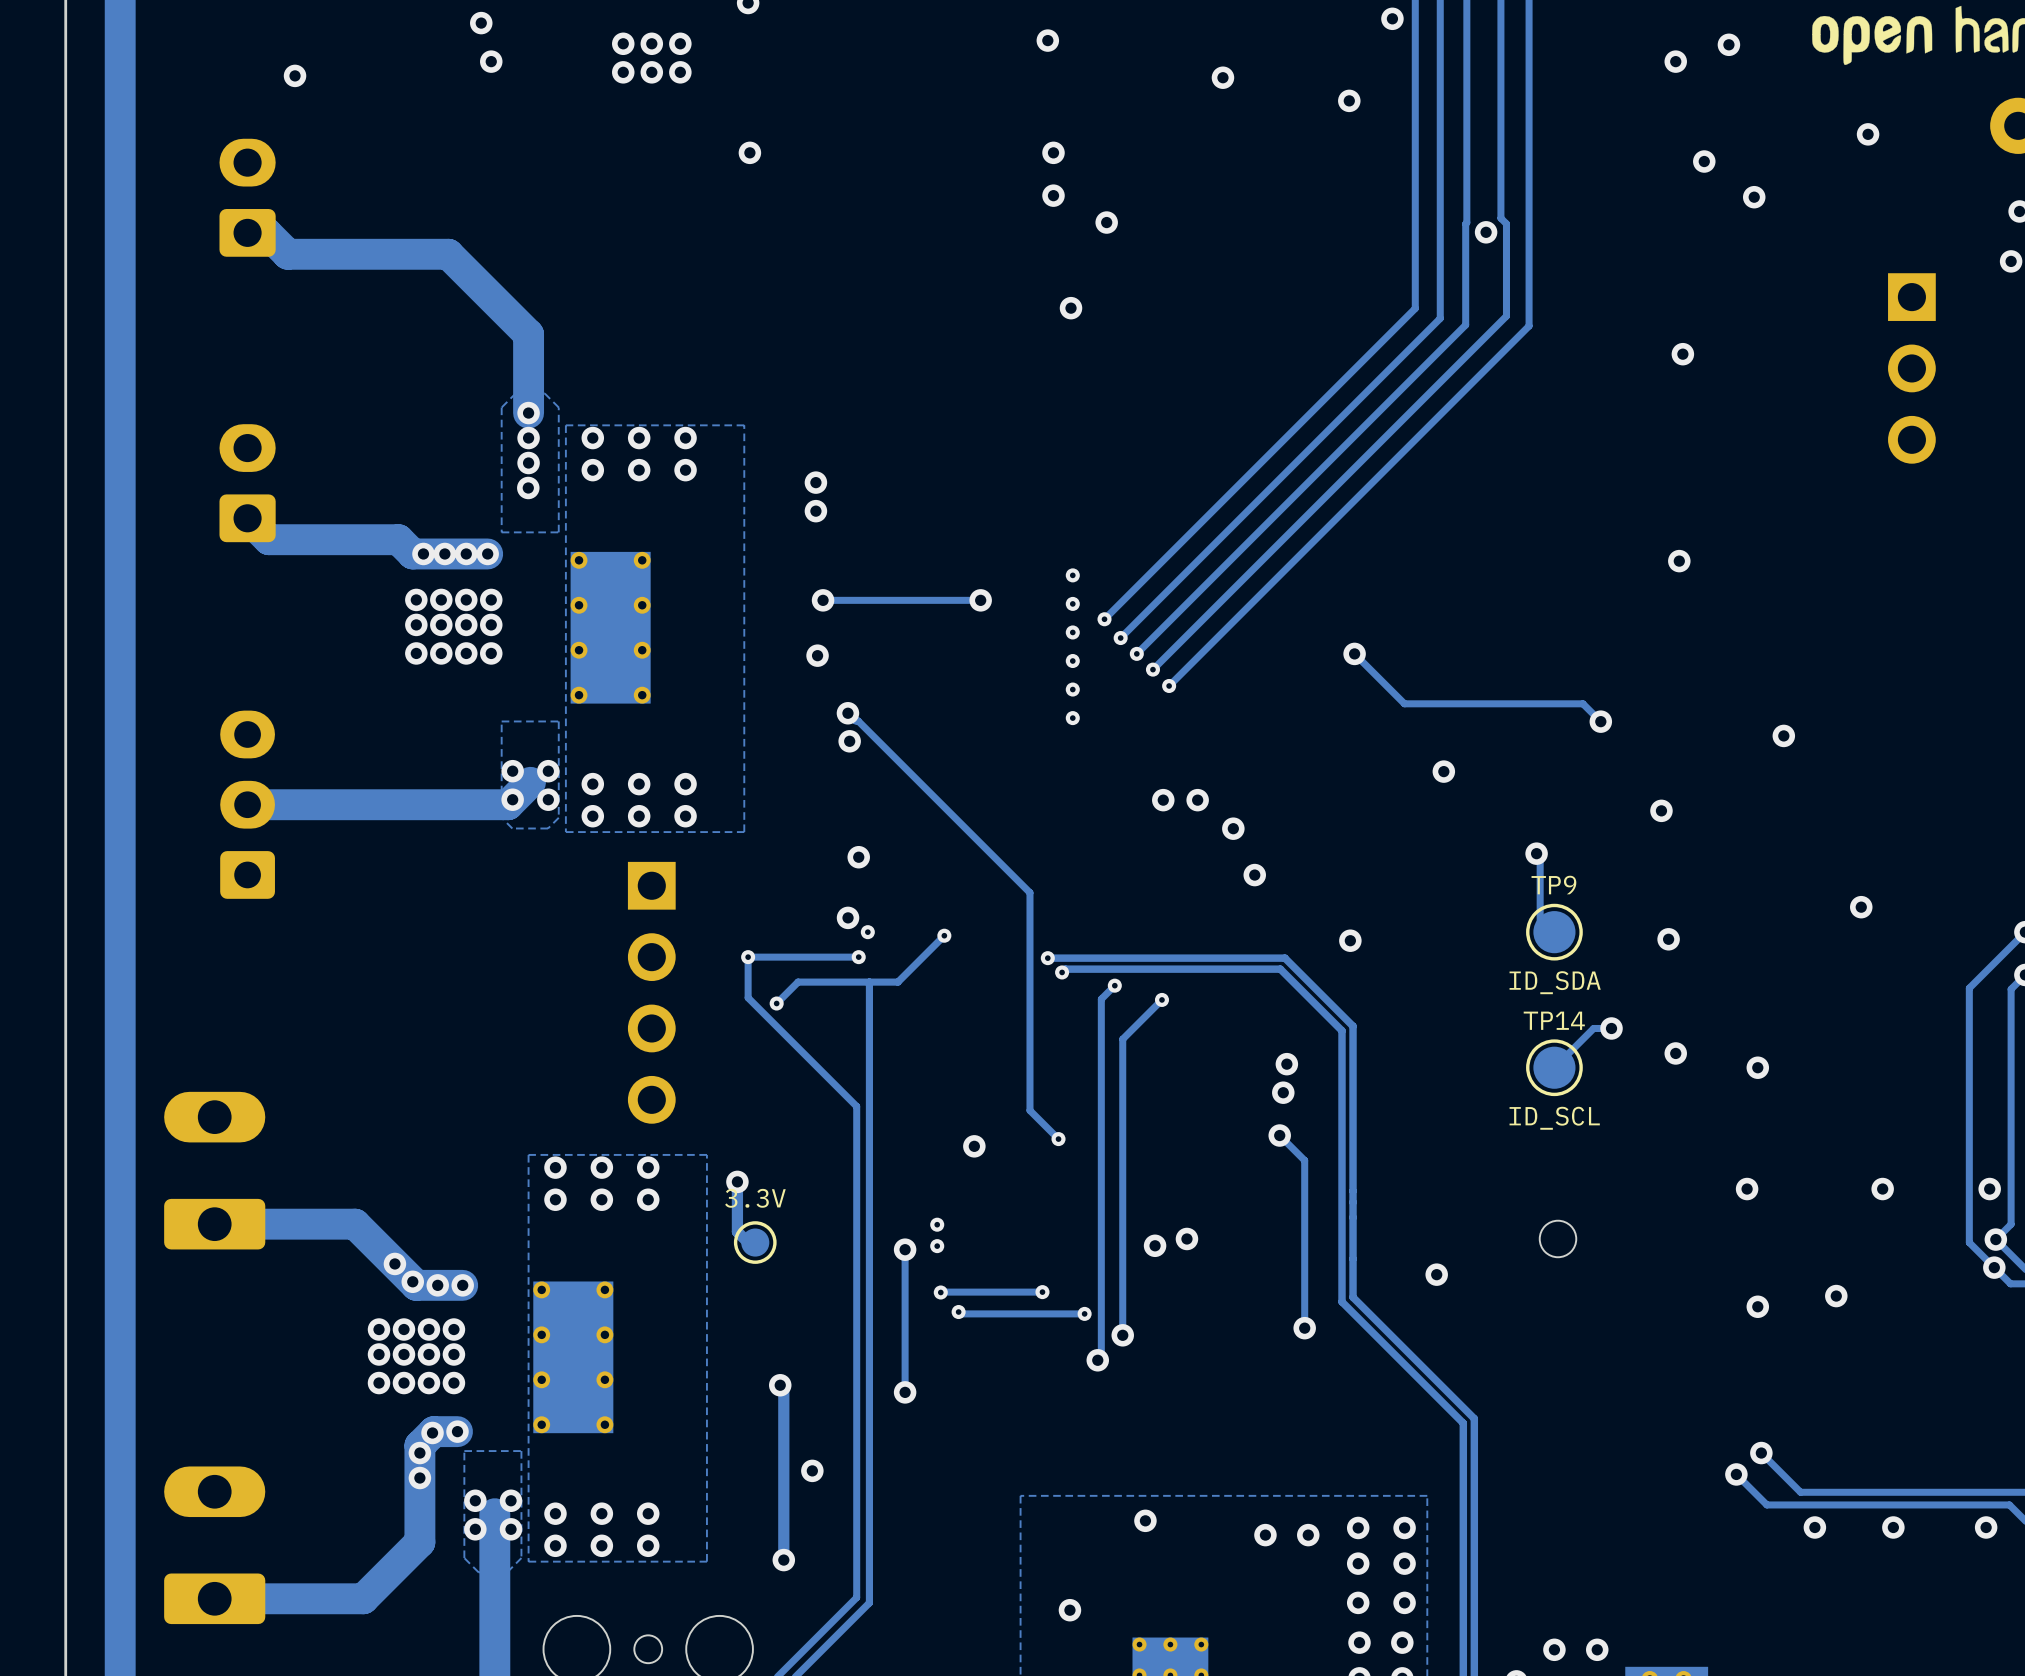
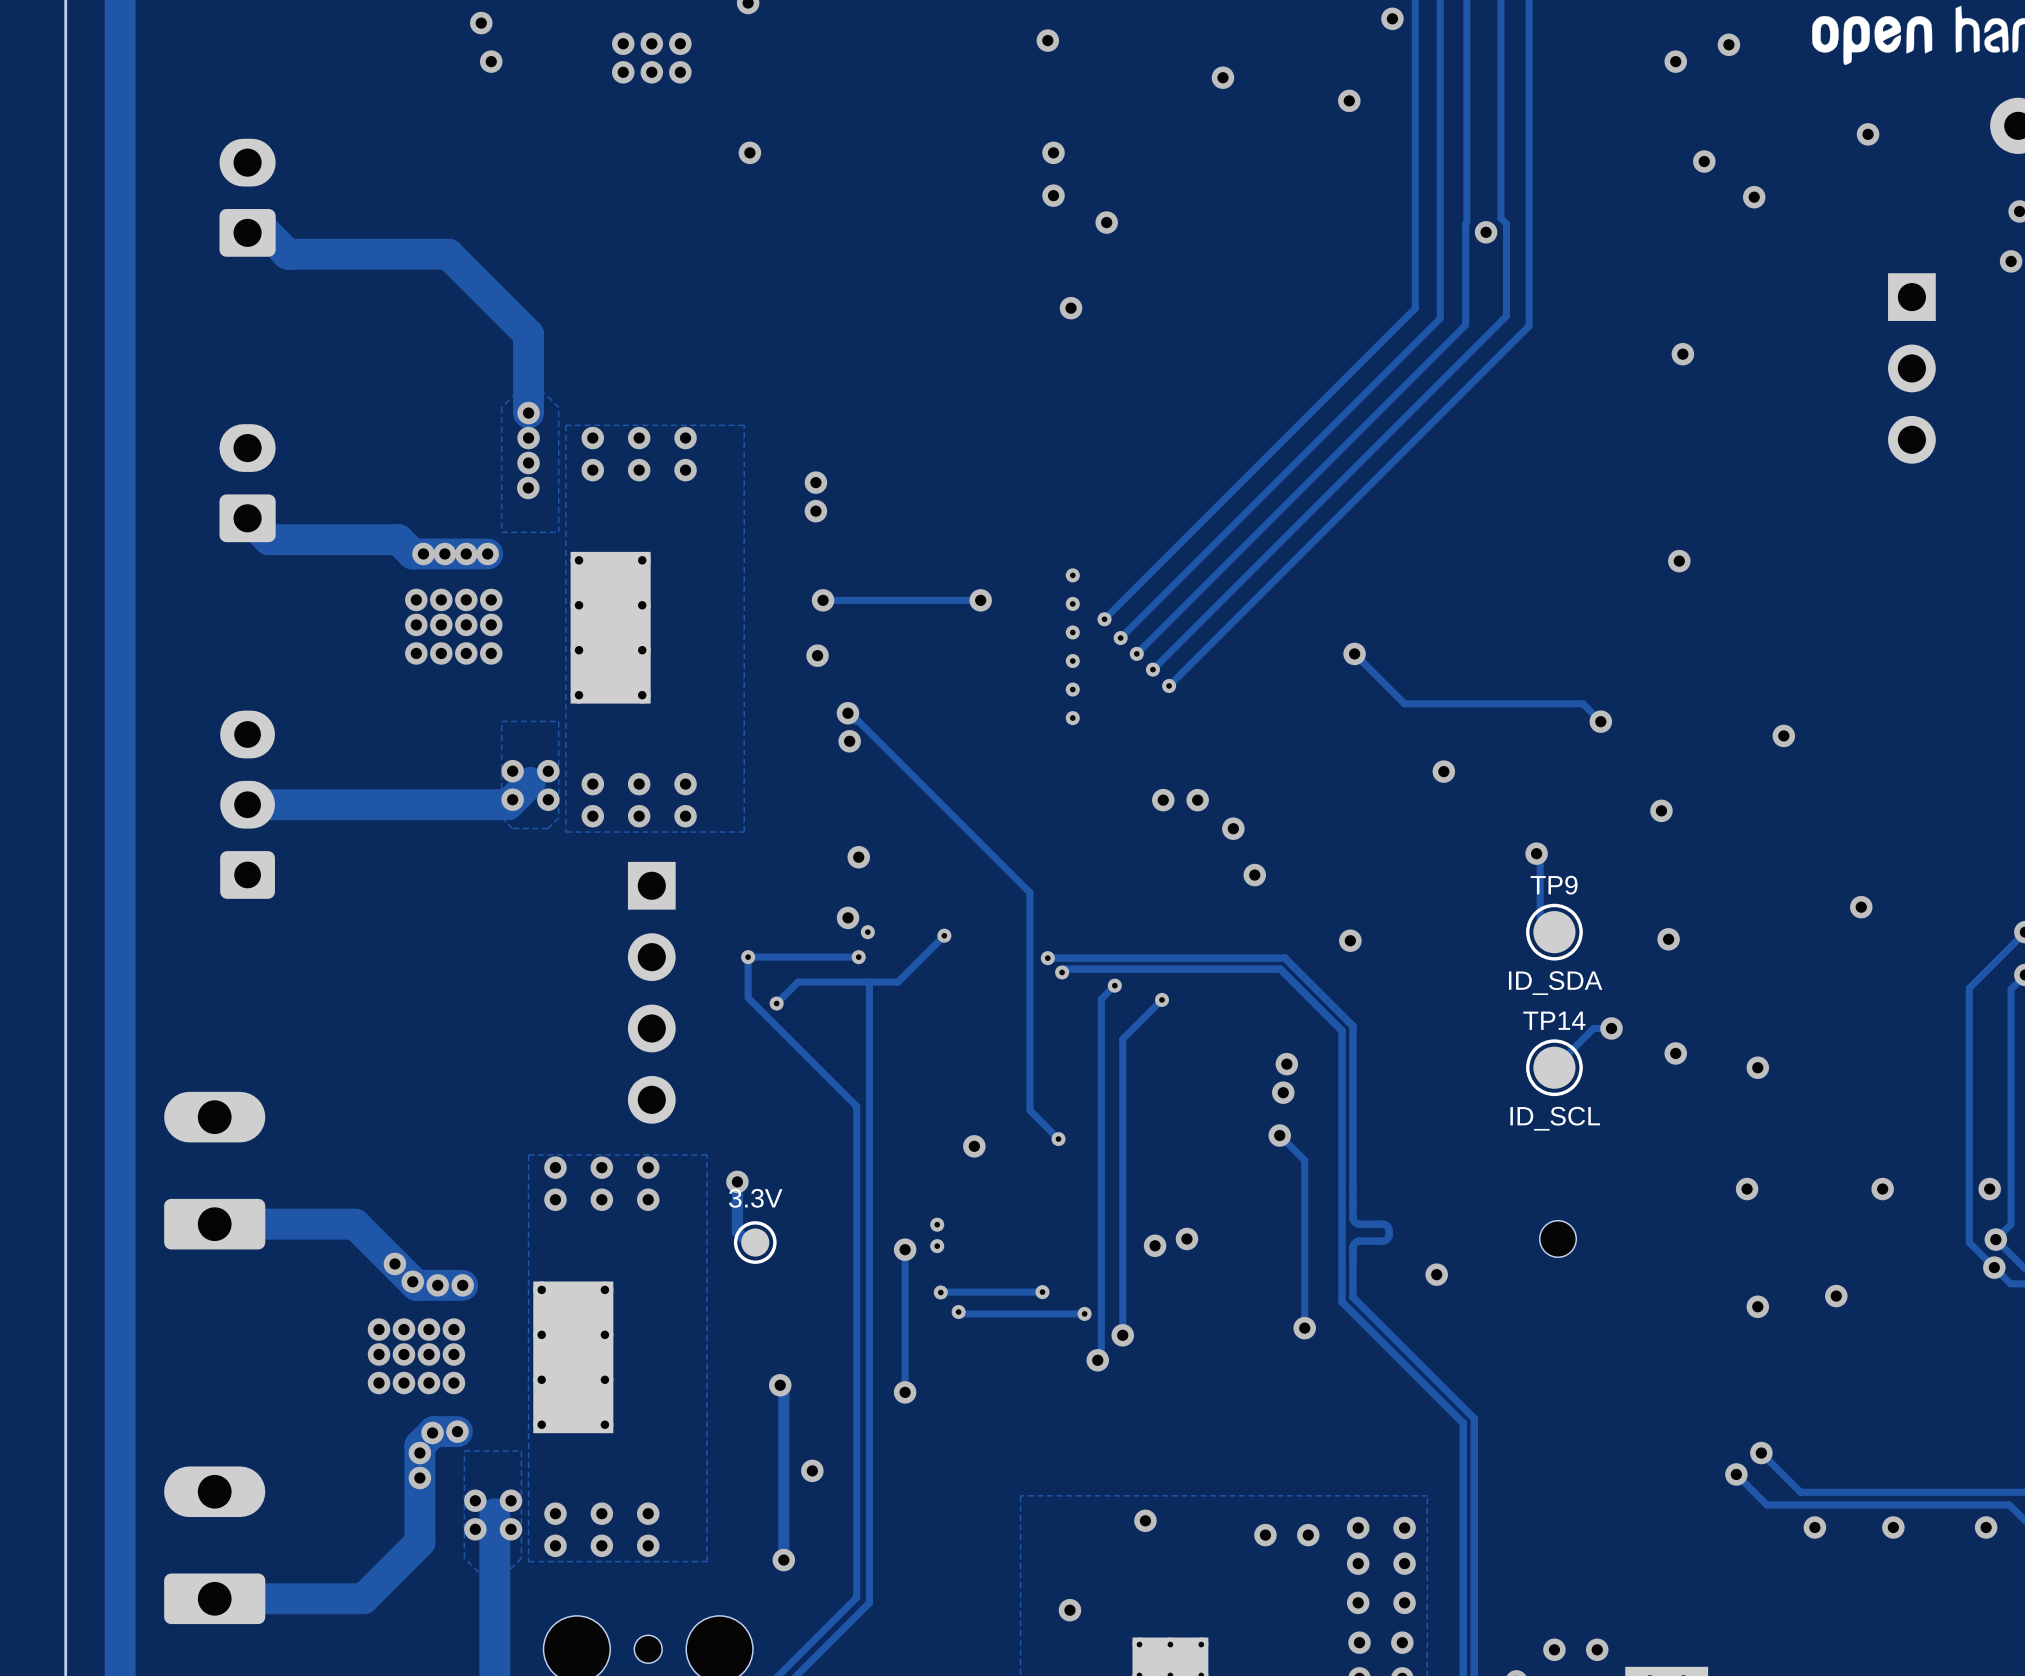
via: (295, 75) -> none
track: (1353, 1217) (1353, 1247) -> (1353, 1217) (1358, 1224) (1384, 1224) (1389, 1230) (1388, 1236) (1385, 1240) (1358, 1241) (1353, 1247)

